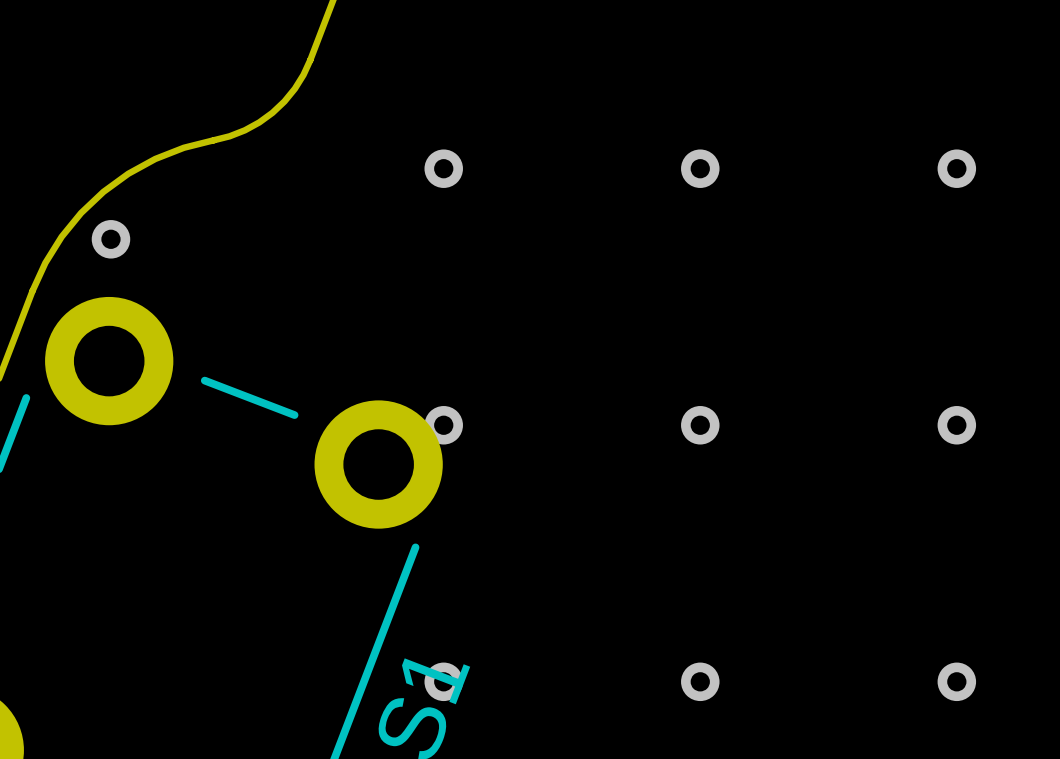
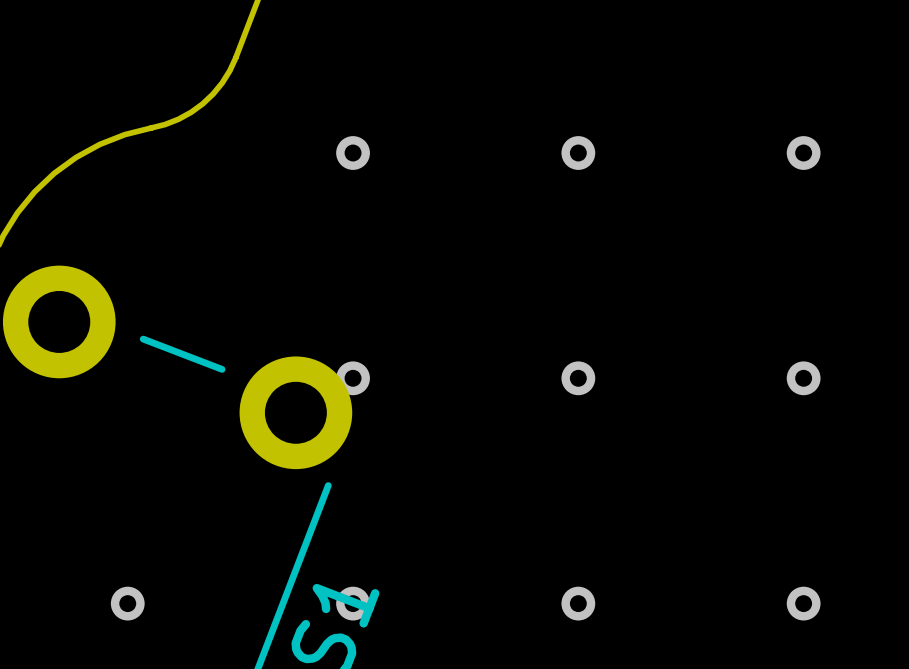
via: (110, 239) -> none
via: none -> (127, 603)

